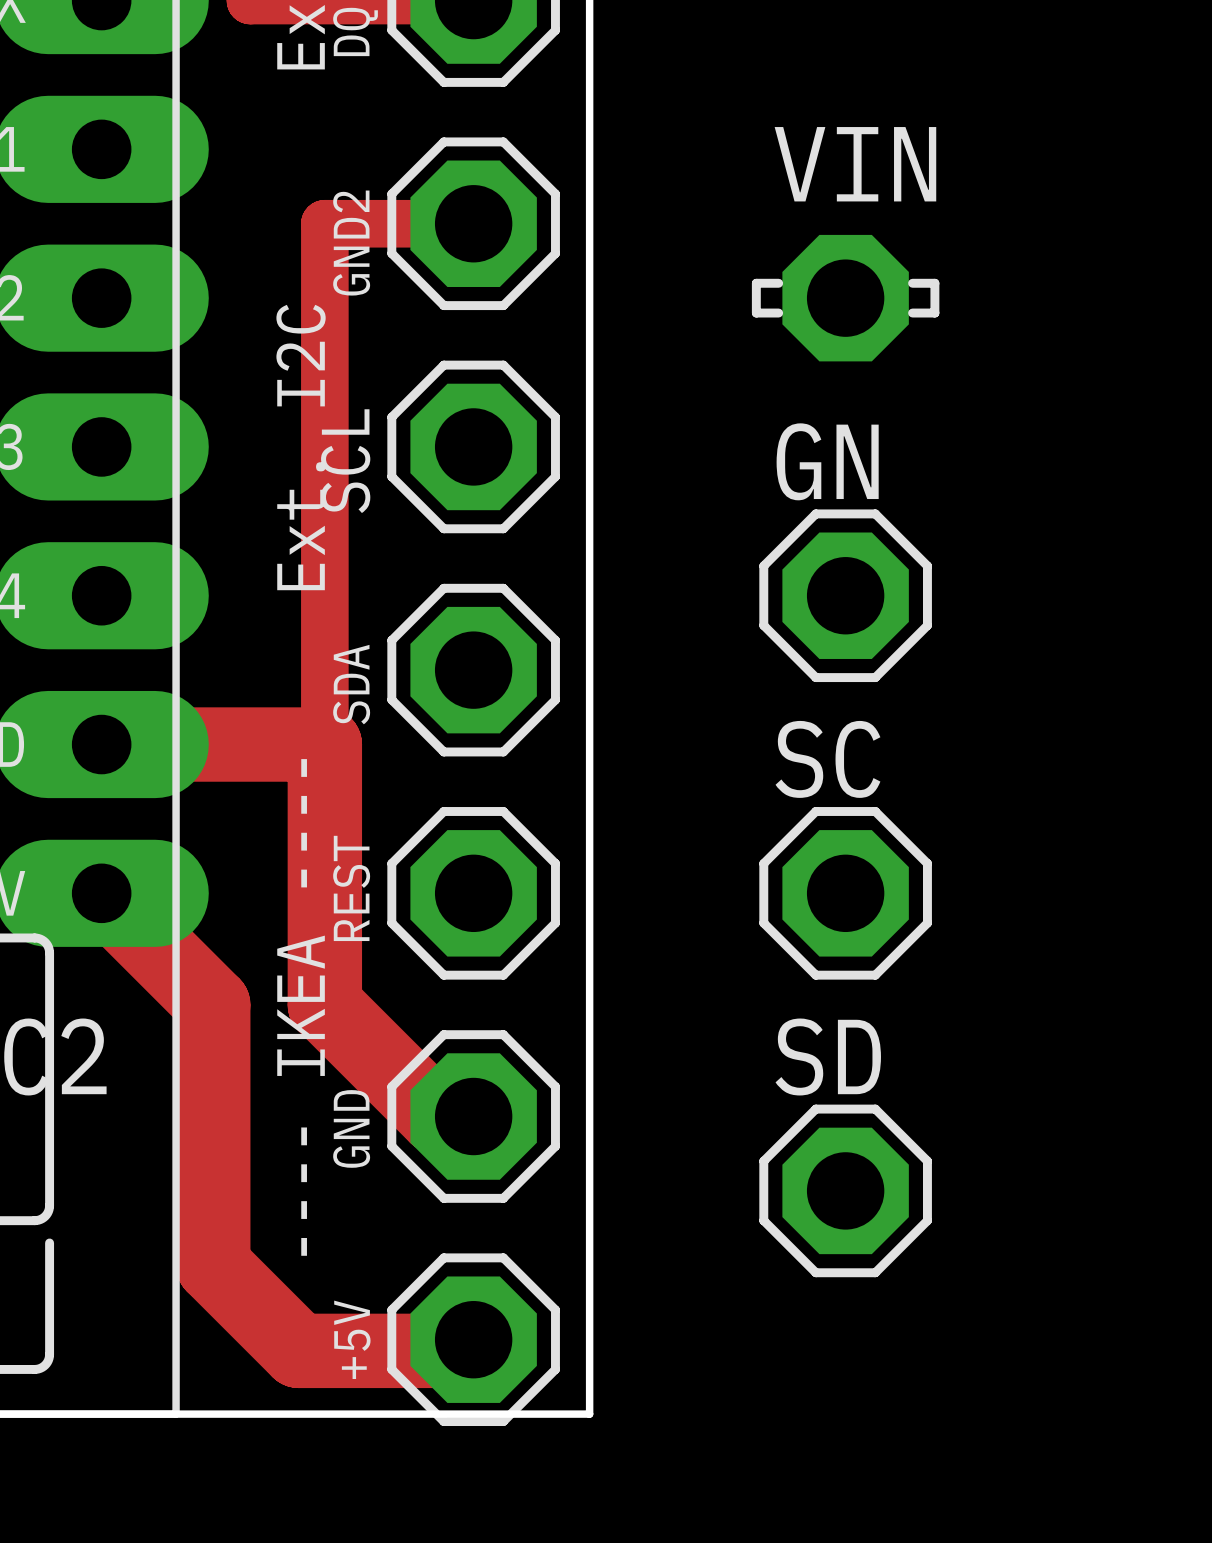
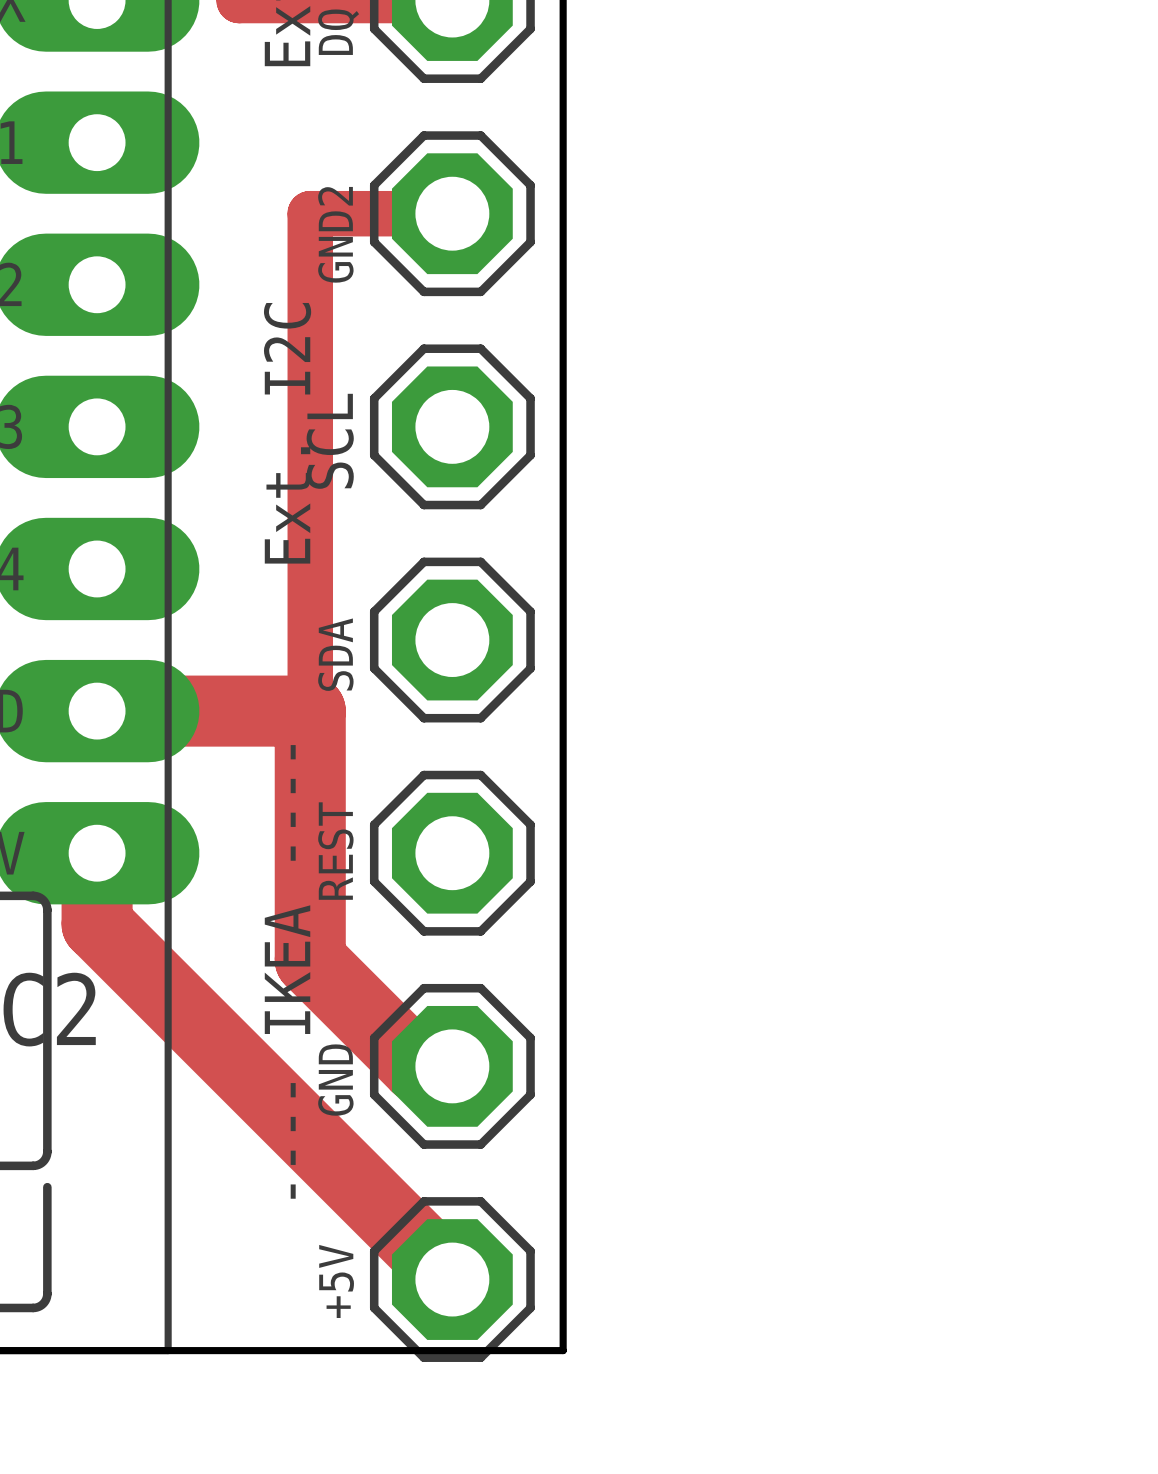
VIN: (845, 298) -> none
GN: (845, 595) -> none
track: (101, 893) (213, 1004) (213, 1265) (298, 1350) (473, 1350) (473, 1339) -> (97, 853) (97, 924) (452, 1279)
SC: (845, 893) -> none
SD: (845, 1190) -> none

